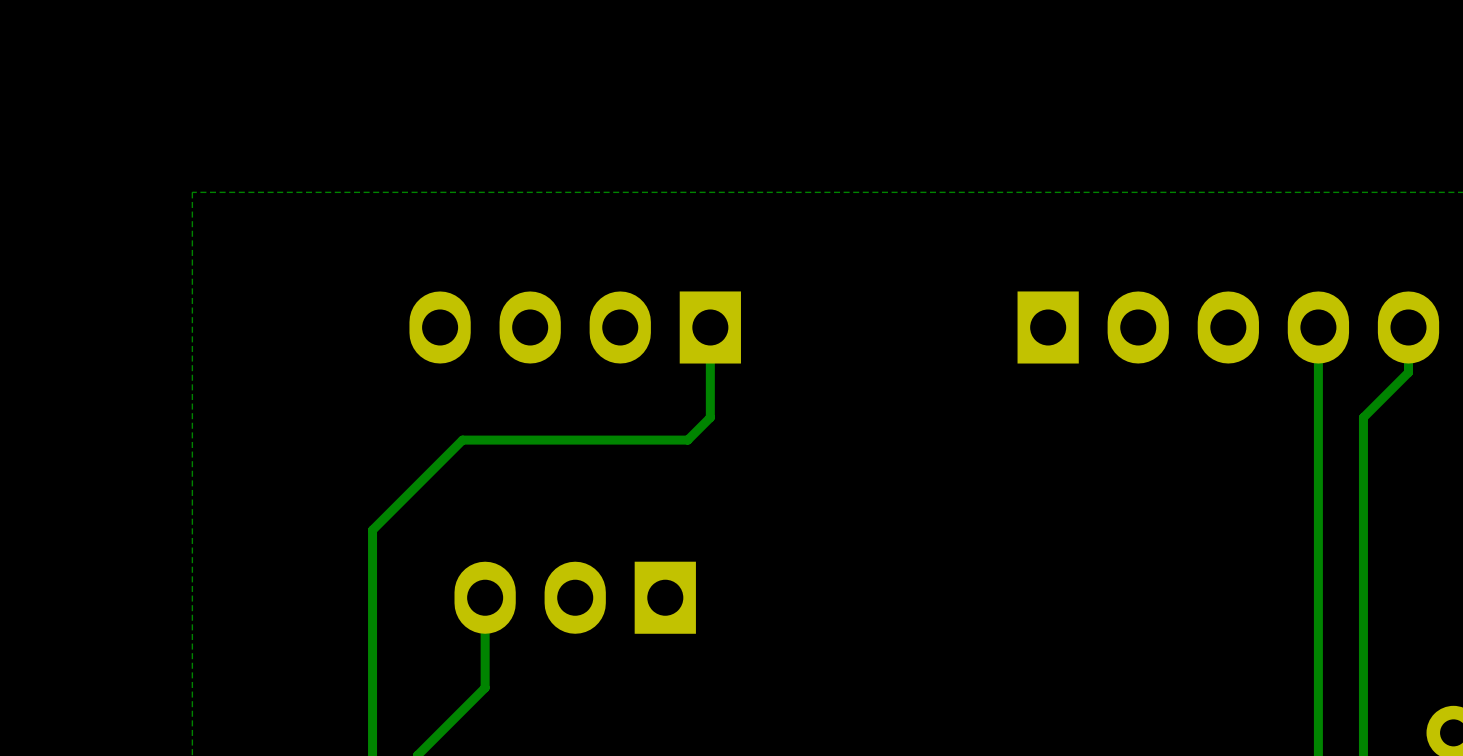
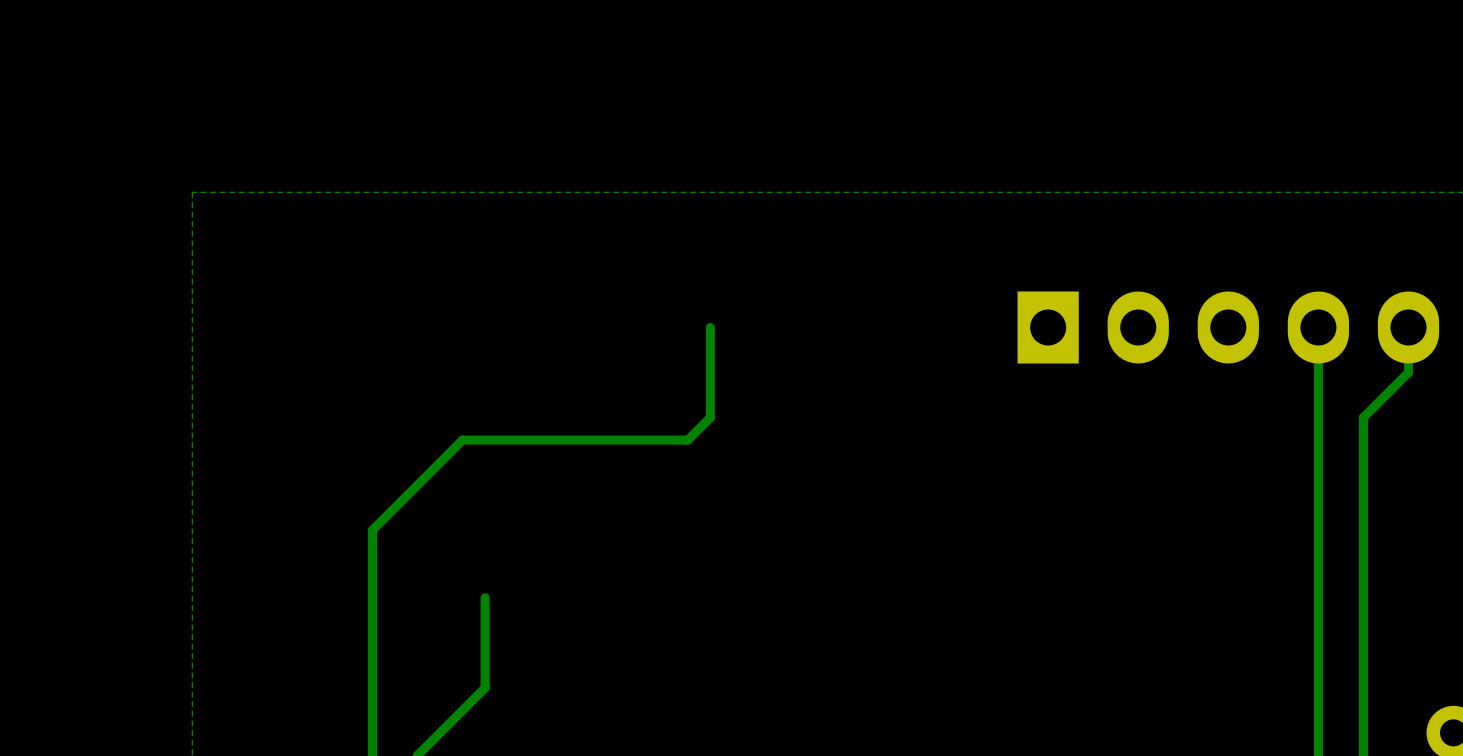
part: (575, 327) -> none
part: (575, 597) -> none

